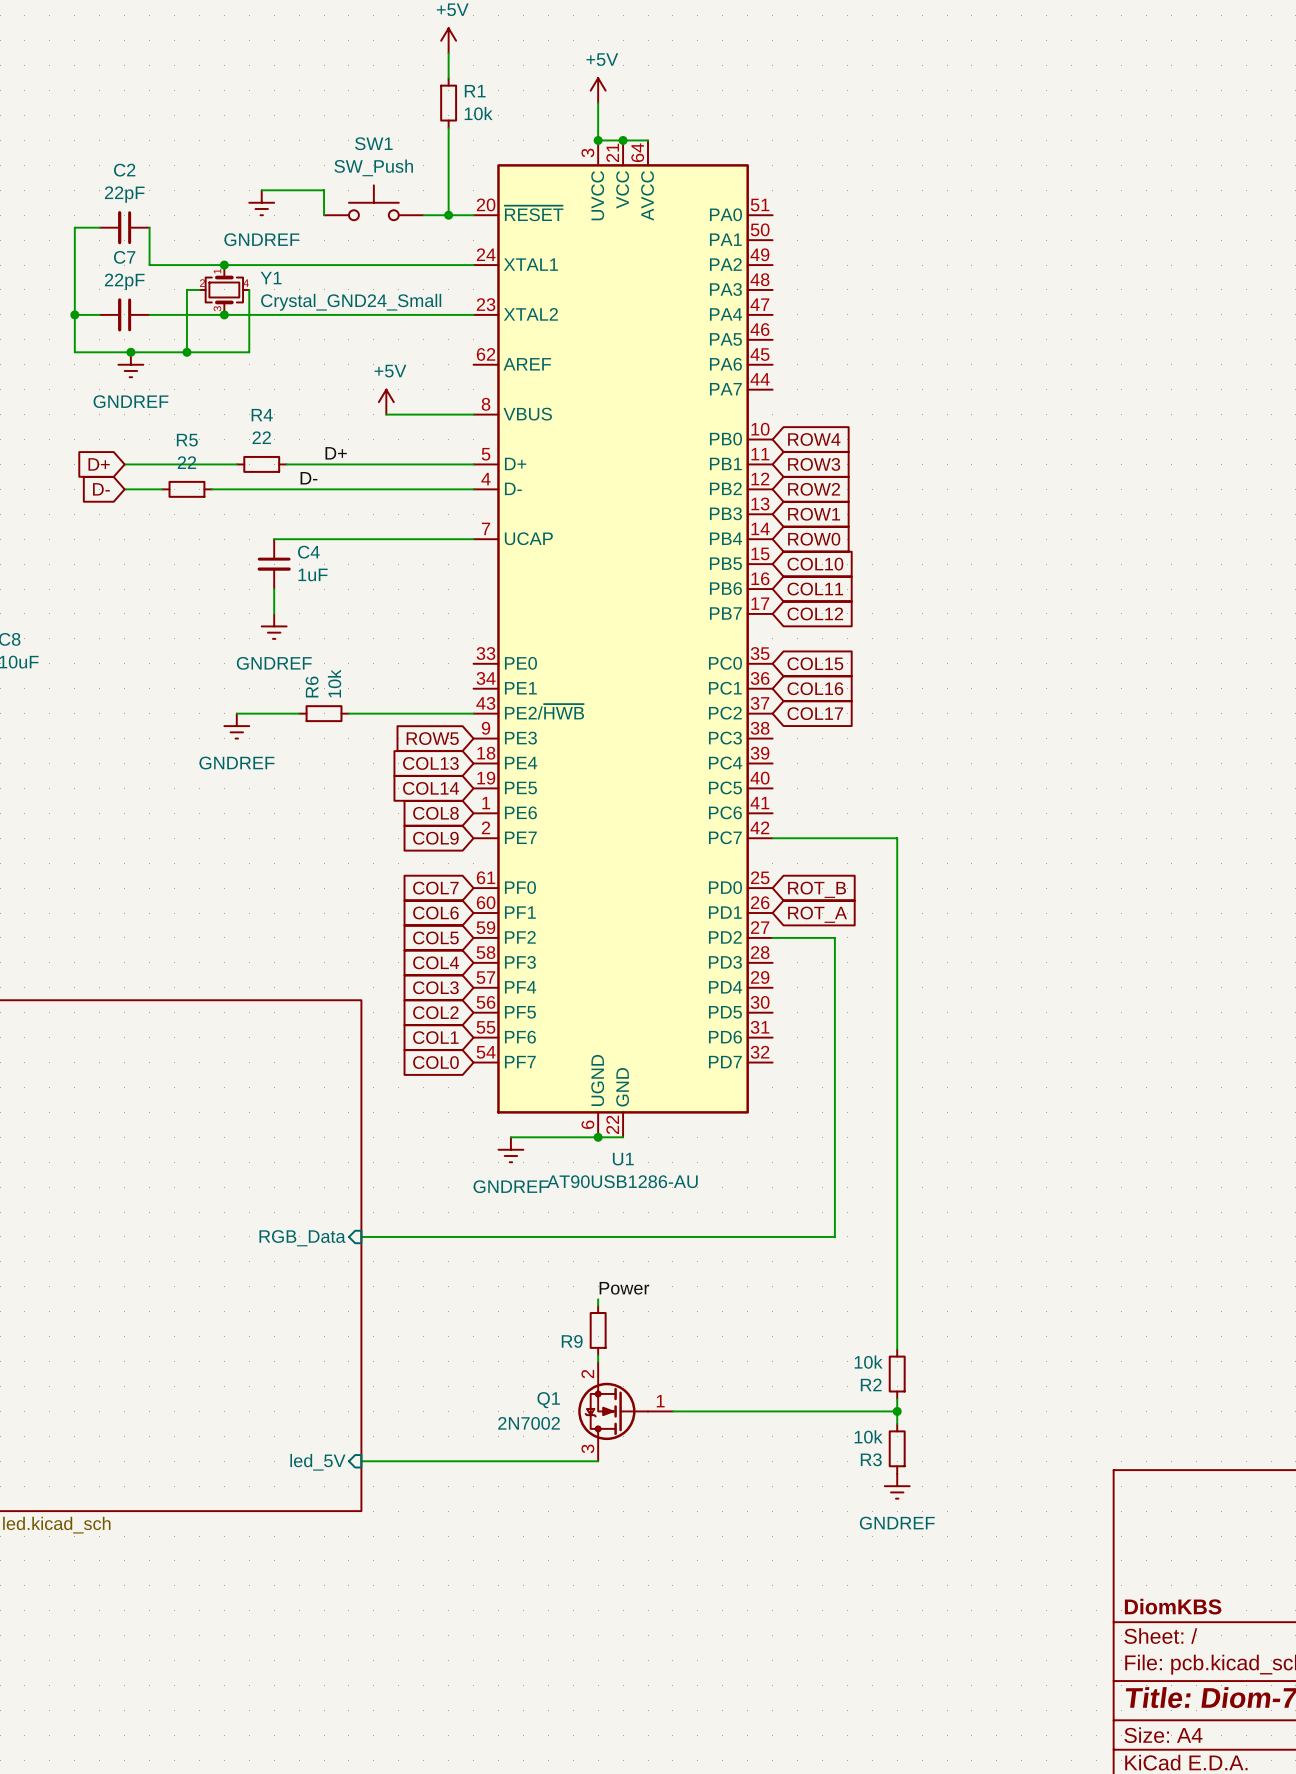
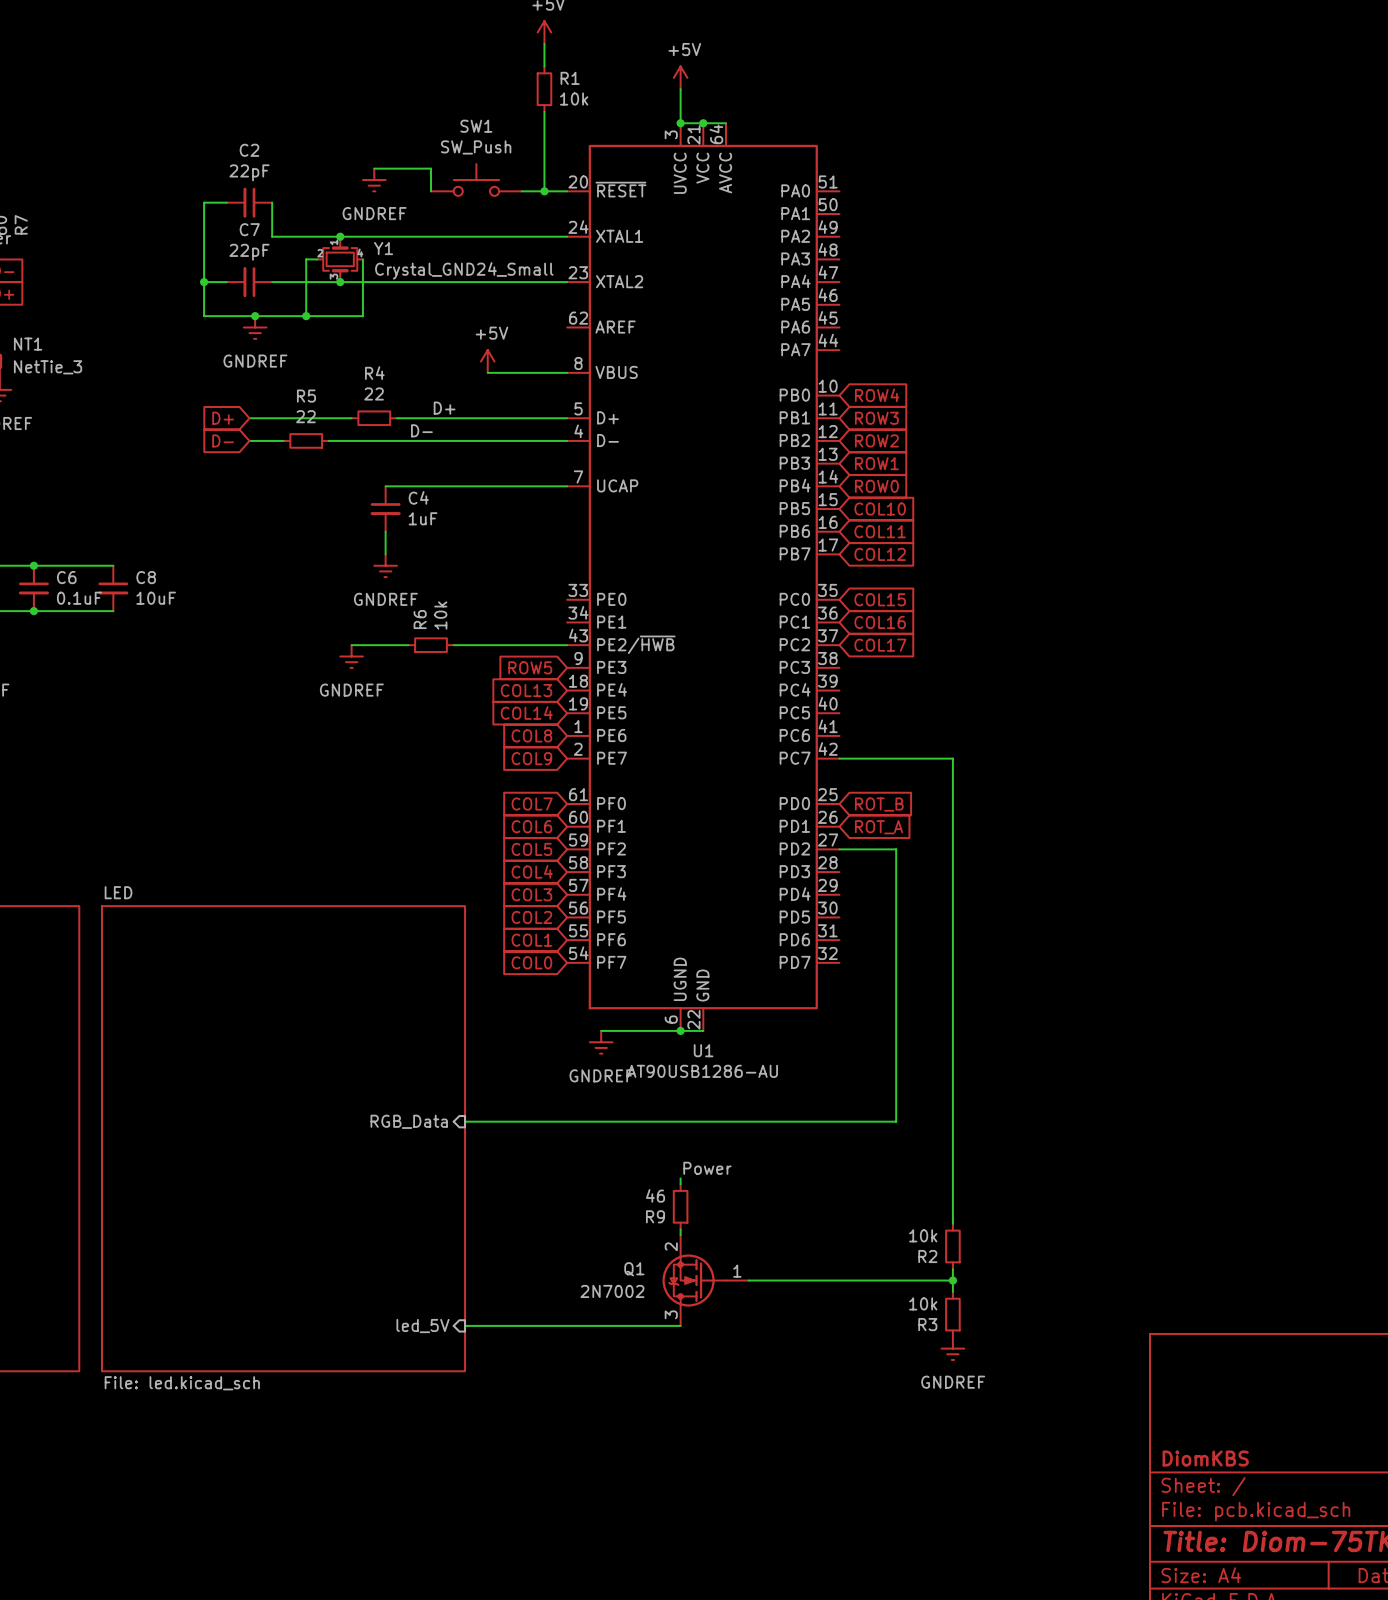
R9 value: none -> 46 (655, 1195)

